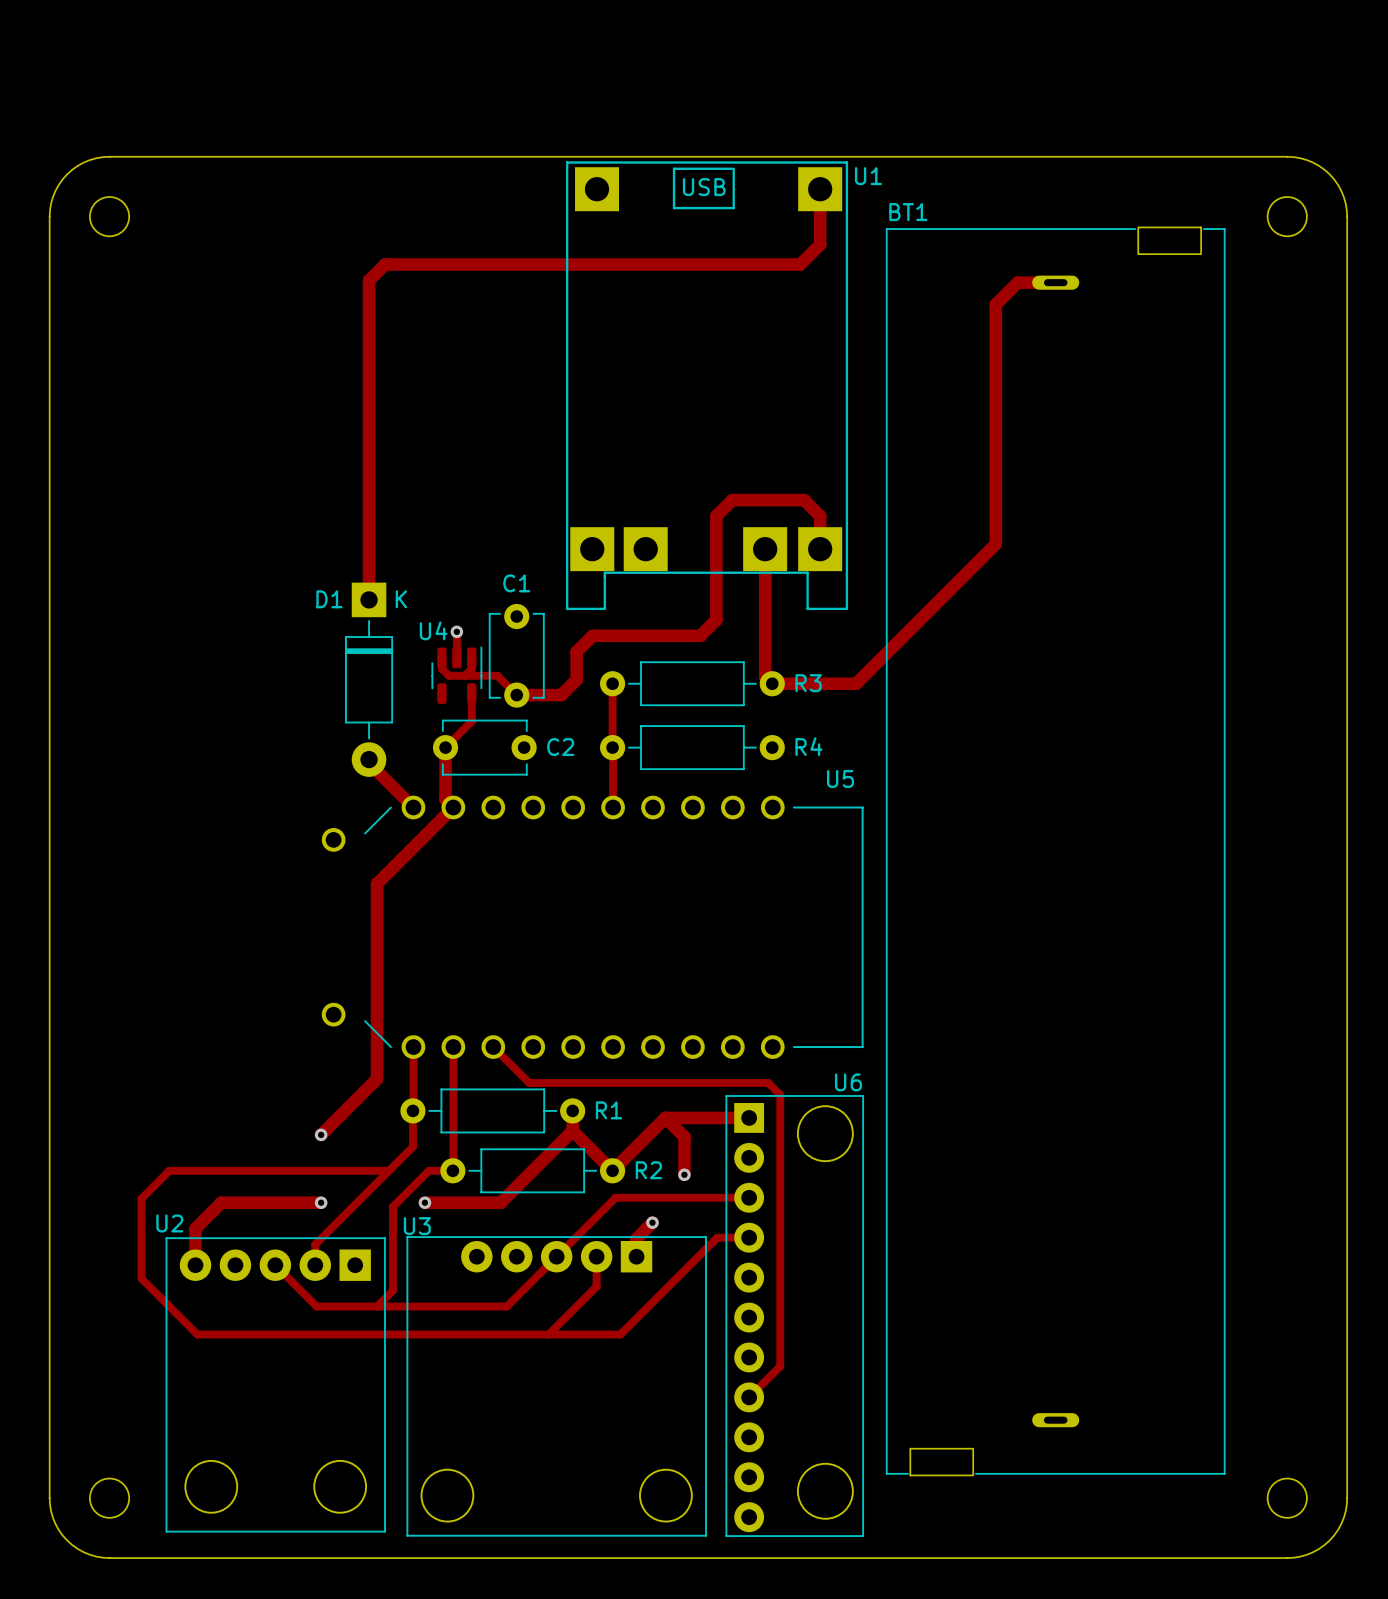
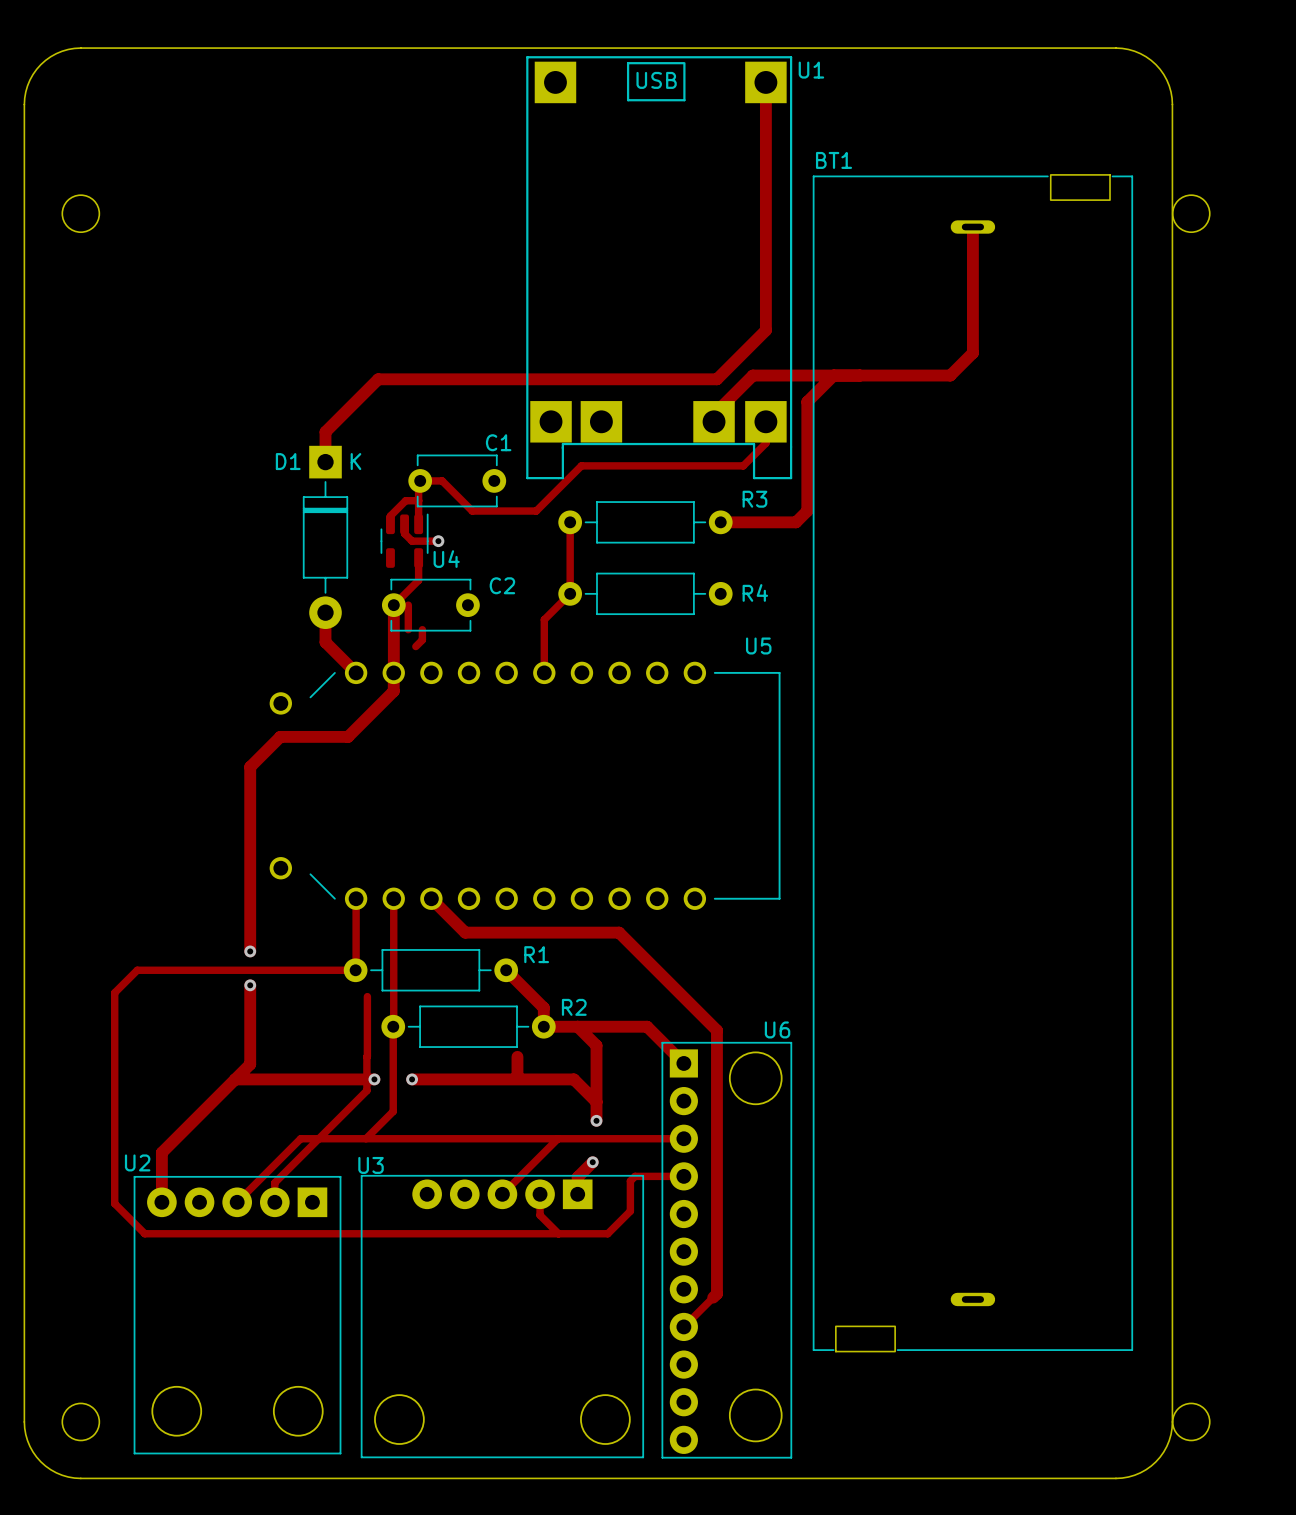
track: (820, 189) (820, 244) (800, 264) (385, 264) (369, 280) (369, 448) -> (765, 82) (765, 330) (716, 379) (378, 379) (325, 432)
board edge: (49, 216) (51, 203) (55, 190) (67, 174) (83, 162) (96, 158) (109, 156) (1287, 156) (1300, 158) (1313, 162) (1324, 169) (1334, 179) (1343, 196) (1347, 216) (1346, 1504) (1343, 1517) (1334, 1535) (1324, 1545) (1307, 1554) (1287, 1558) (1207, 1558) -> (24, 213) (24, 104) (27, 85) (33, 74) (45, 60) (56, 53) (74, 48) (1115, 48) (1140, 53) (1160, 69) (1169, 85) (1172, 104) (1172, 1421) (1166, 1446) (1155, 1461) (1134, 1475) (1115, 1478)
track: none -> (972, 227) (972, 352) (950, 375) (752, 375) (714, 414) (714, 421)
track: (1055, 282) (1017, 282) (995, 304) (995, 544) (856, 683) (772, 683) (765, 676) (765, 549) -> none
U1 position: (707, 385) -> (659, 267)
track: none -> (833, 375) (807, 401) (807, 511) (796, 522) (720, 522)
track: none -> (765, 421) (765, 443) (743, 465) (581, 465) (536, 511) (472, 511) (442, 480) (420, 480) (418, 482) (418, 524)
track: (369, 480) (369, 599) -> none
track: none -> (418, 500) (405, 500) (390, 515) (390, 524)
track: none -> (570, 522) (570, 593) (544, 619) (544, 672)
track: none -> (404, 524) (404, 533) (412, 541) (438, 541)
track: (820, 549) (820, 516) (804, 500) (732, 500) (716, 516) (716, 619) (700, 635) (592, 635) (576, 651) (576, 679) (561, 695) (516, 695) (497, 675) (448, 675) (441, 668) (441, 657) -> none
track: none -> (418, 558) (418, 580) (393, 605) (393, 691) (348, 736) (280, 736) (250, 767) (250, 951)
C1 name position: C1 (516, 583) -> C1 (498, 442)
U4 name position: U4 (433, 630) -> U4 (446, 559)
via position: (456, 631) -> (438, 541)
track: none -> (325, 612) (325, 642) (356, 672)
C1 rotation: 0° (516, 655) -> 90° clockwise (457, 480)
C1 position: (516, 655) -> (457, 480)
U4 position: (456, 675) -> (404, 540)
D1 position: (369, 679) -> (325, 537)
track: (612, 683) (613, 807) -> none
R3 position: (692, 683) -> (645, 522)
R3 name position: R3 (808, 683) -> R3 (754, 499)
track: (471, 693) (471, 721) (445, 747) (445, 799) (453, 807) (377, 883) (377, 1078) (321, 1134) -> none
C2 position: (484, 747) -> (430, 605)
C2 name position: C2 (560, 747) -> C2 (502, 585)
R4 position: (692, 747) -> (645, 593)
track: (369, 759) (369, 763) (413, 807) -> none
BT1 position: (1055, 851) -> (972, 763)
U5 position: (592, 927) -> (525, 785)
track: none -> (393, 898) (393, 1111) (365, 1138)
via: none -> (250, 951)
via: none -> (250, 985)
track: (453, 1047) (453, 1170) (428, 1170) (392, 1206) (392, 1290) (377, 1306) -> none
track: (493, 1047) (529, 1082) (768, 1082) (780, 1094) (780, 1366) -> (431, 898) (465, 932) (619, 932) (716, 1030) (716, 1293) (713, 1297)
track: none -> (577, 1026) (596, 1045) (596, 1120)
R1 position: (492, 1110) -> (430, 970)
R1 name position: R1 (608, 1110) -> R1 (536, 954)
track: (665, 1117) (749, 1117) -> (506, 970) (543, 1007) (543, 1026) (647, 1026) (683, 1063)
track: (665, 1117) (612, 1170) (572, 1130) (500, 1202) (424, 1202) -> none
track: (665, 1117) (684, 1136) (684, 1174) -> none
track: none -> (235, 1079) (374, 1079)
via: (321, 1134) -> none
via: none -> (374, 1079)
track: none -> (412, 1079) (573, 1079) (596, 1102)
via: none -> (412, 1079)
track: (389, 1170) (169, 1170) (141, 1198) (141, 1278) (197, 1334) (620, 1334) (717, 1237) -> (356, 898) (355, 970) (137, 970) (114, 992) (114, 1203) (144, 1233) (607, 1233) (630, 1211) (630, 1181) (635, 1176) (653, 1176)
R2 position: (532, 1170) -> (468, 1026)
R2 name position: R2 (648, 1170) -> R2 (574, 1007)
via position: (684, 1174) -> (596, 1120)
track: (321, 1202) (221, 1202) (195, 1228) -> (250, 985) (250, 1064) (161, 1152) (161, 1167)
via: (321, 1202) -> none
via: (424, 1202) -> none
track: (556, 1256) (506, 1306) (316, 1306) (275, 1265) -> (557, 1138) (300, 1138) (237, 1202)
track: (596, 1278) (596, 1286) (548, 1334) -> (540, 1215) (558, 1233)

